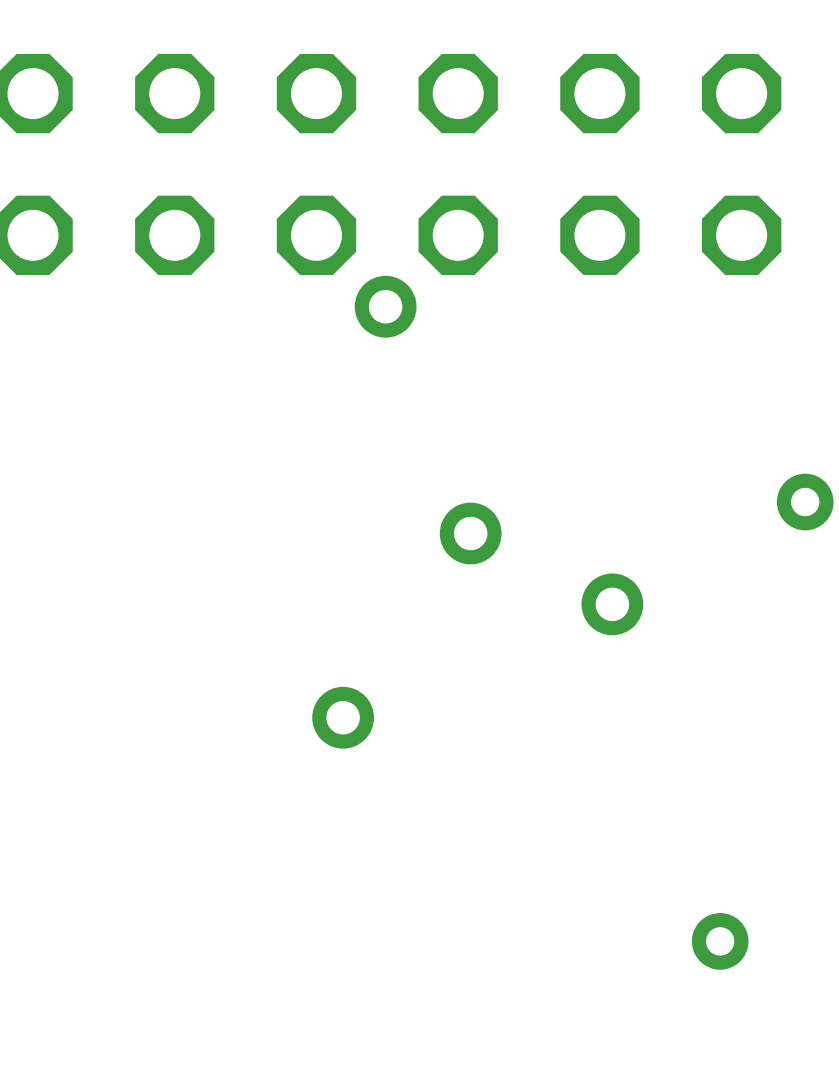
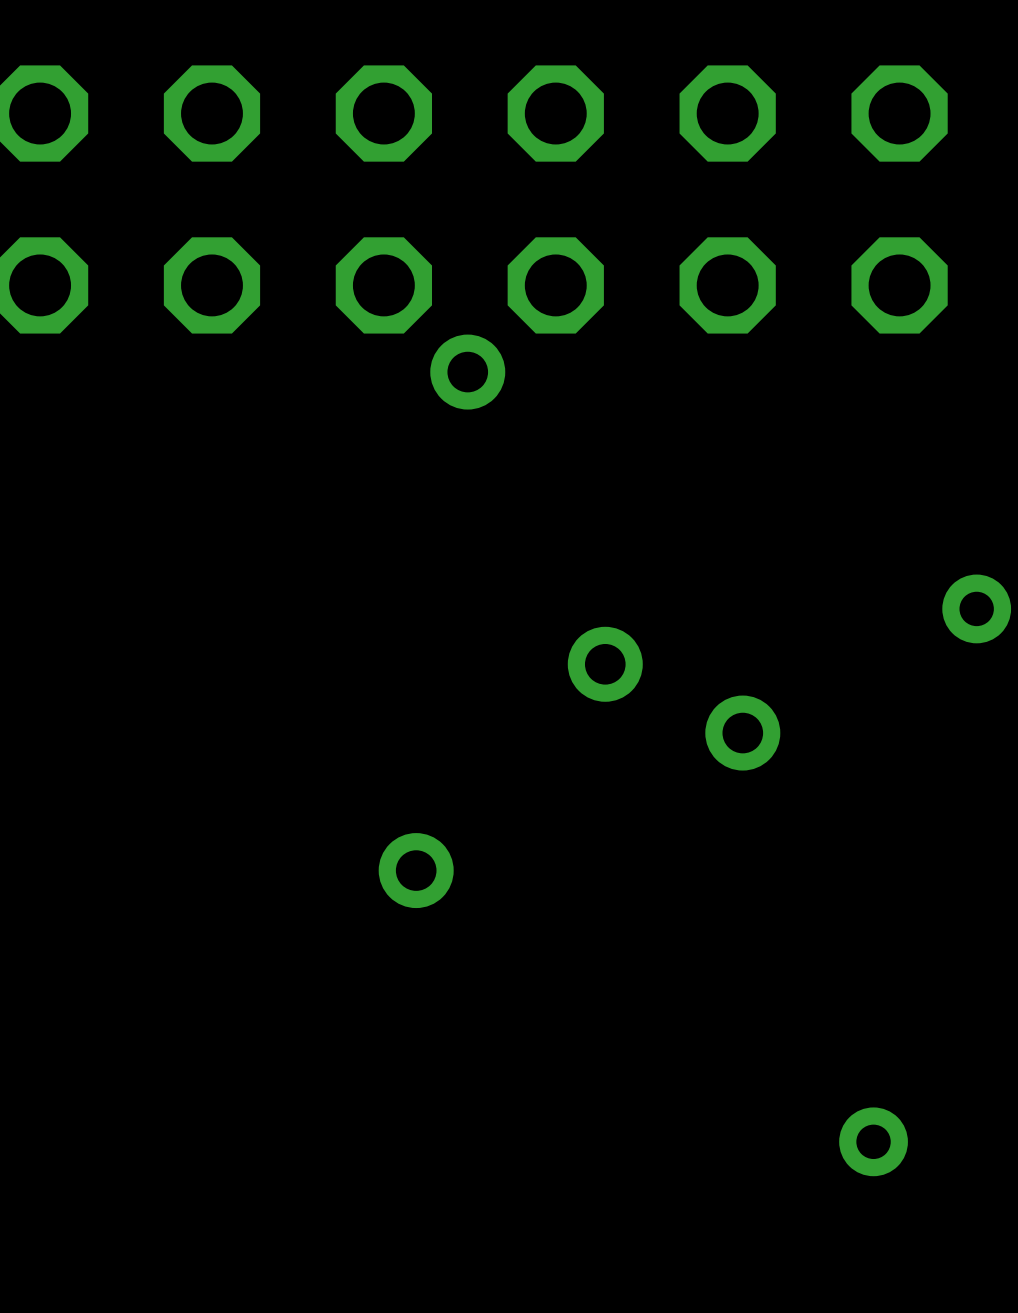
via position: (470, 533) -> (605, 664)

